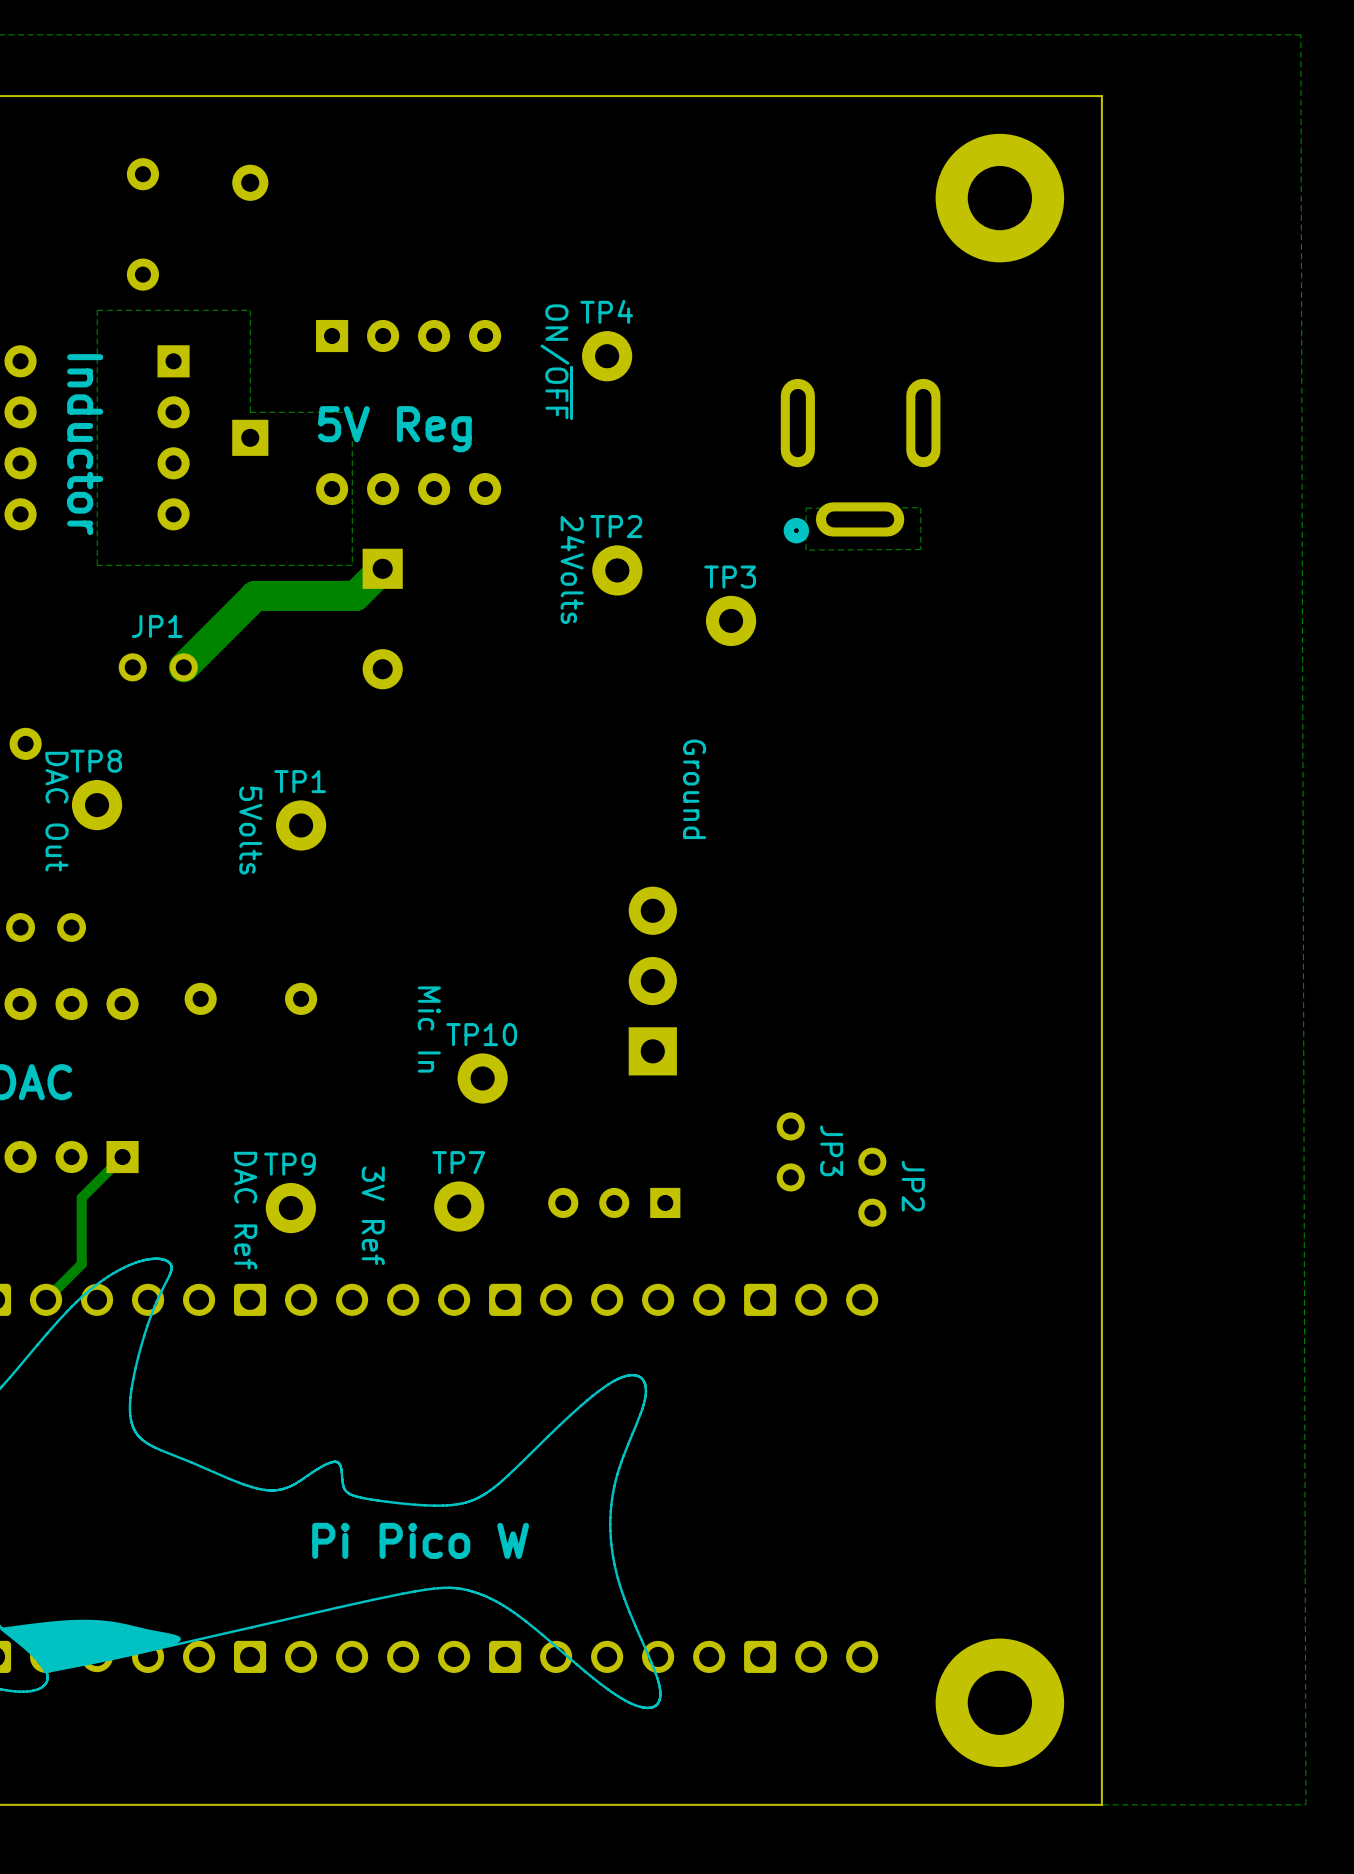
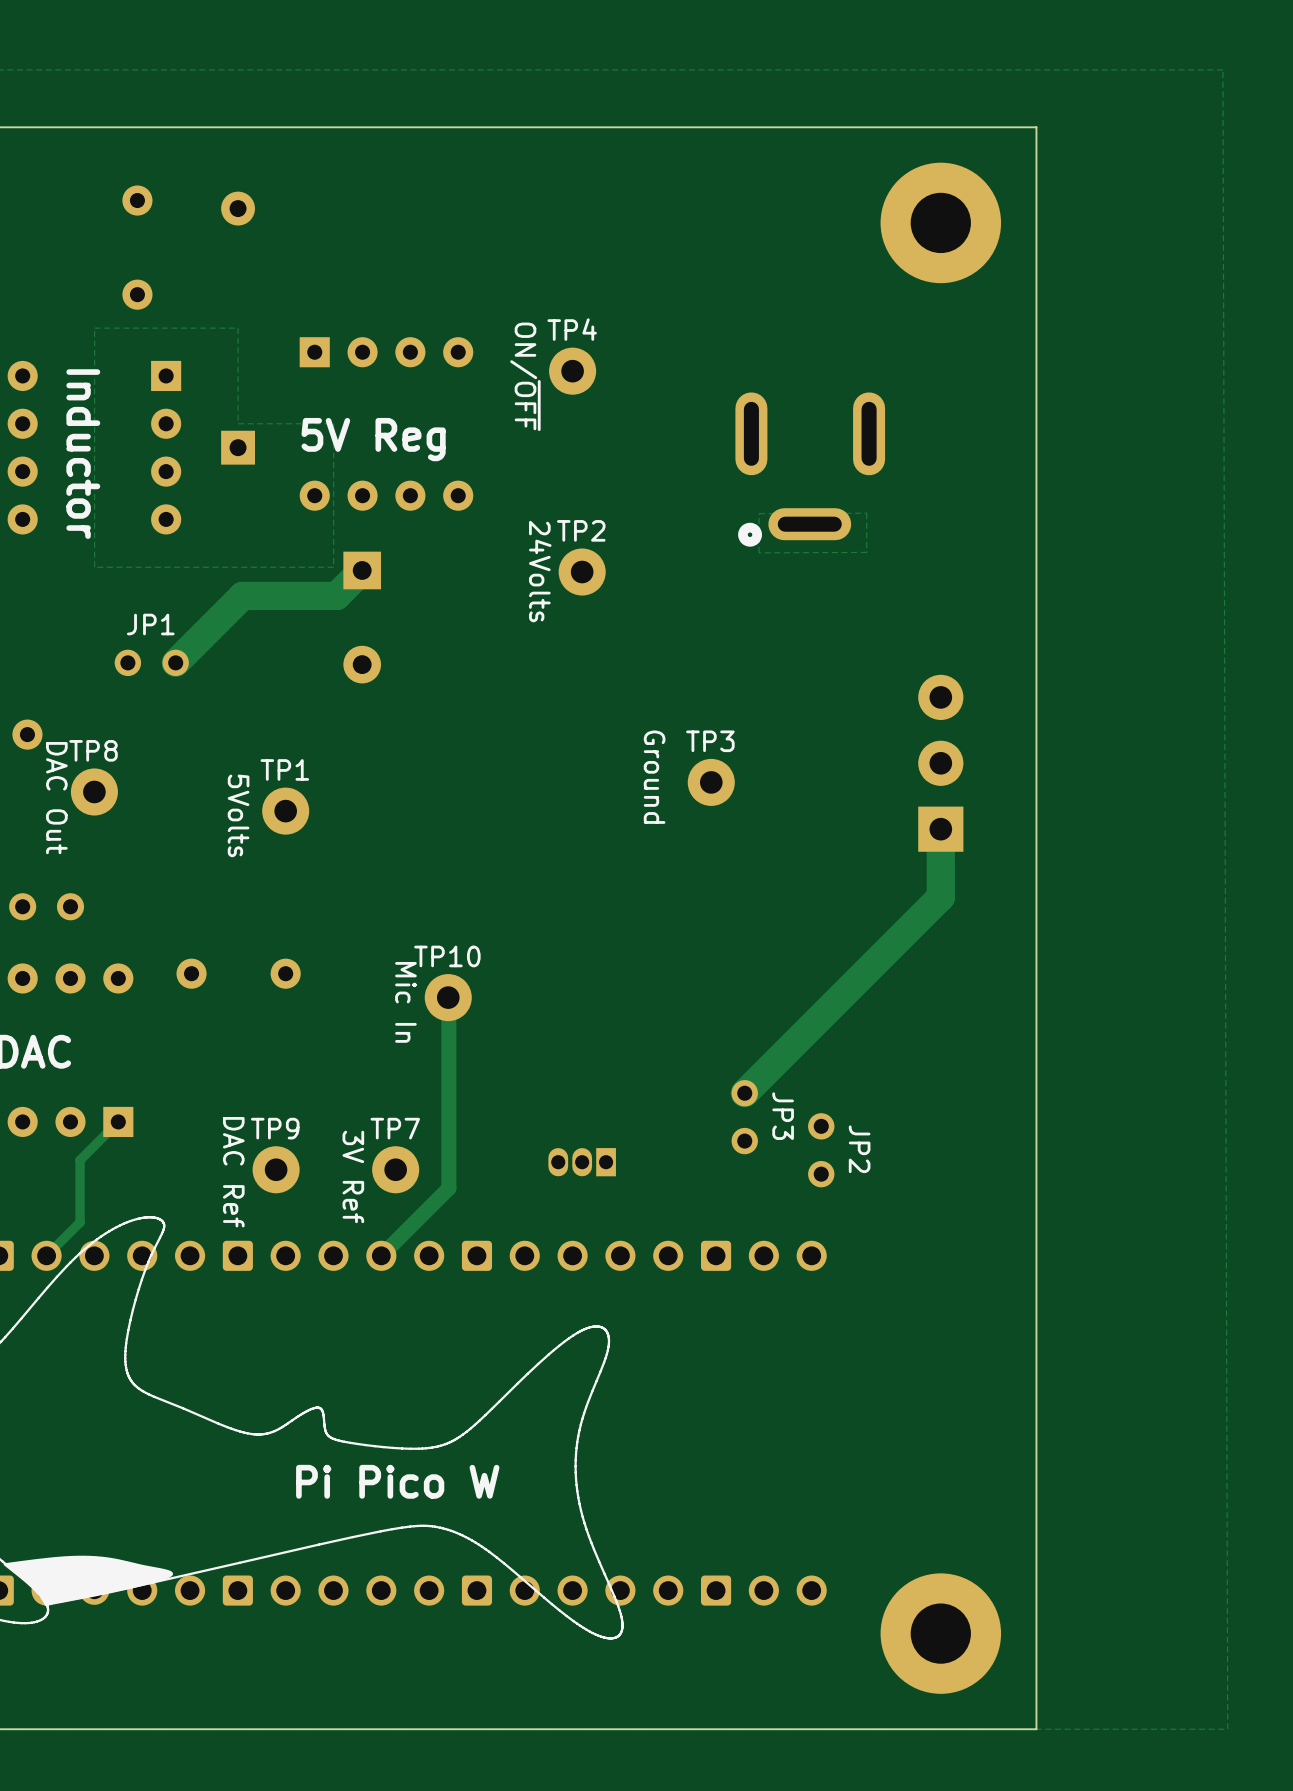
TP3 position: (731, 620) -> (711, 782)
track: none -> (940, 829) (940, 897) (744, 1093)
part position: (652, 981) -> (940, 763)
track: none -> (448, 1002) (448, 1188) (381, 1255)
TP10 position: (482, 1078) -> (448, 997)
part footprint: [548, 1187, 681, 1219] -> [548, 1148, 616, 1177]
TP7 position: (459, 1206) -> (395, 1169)

